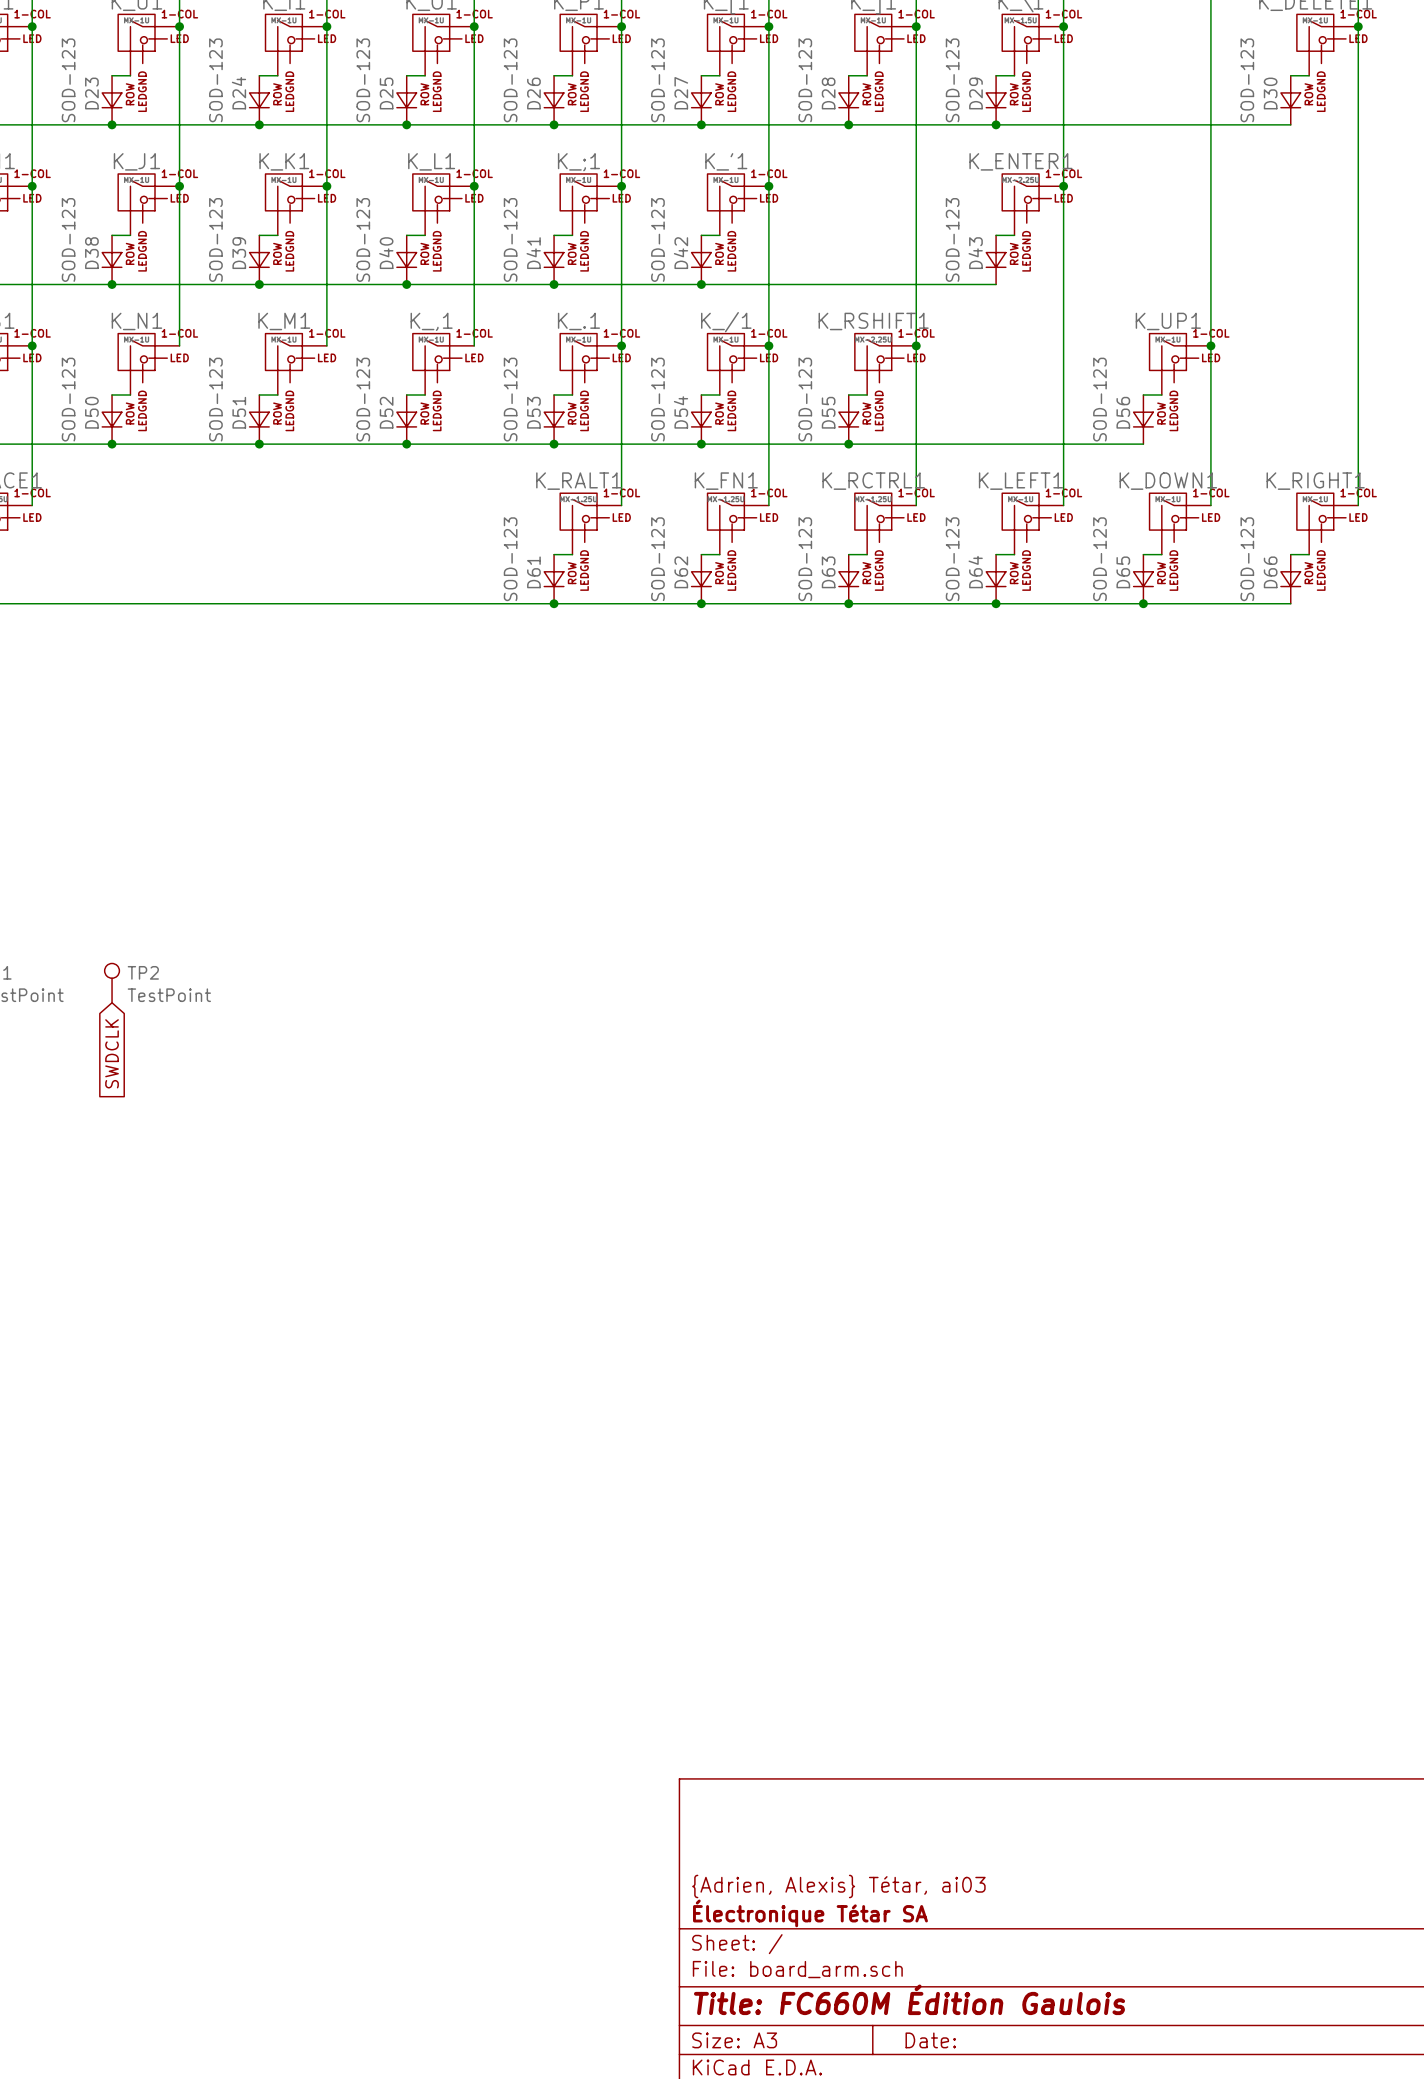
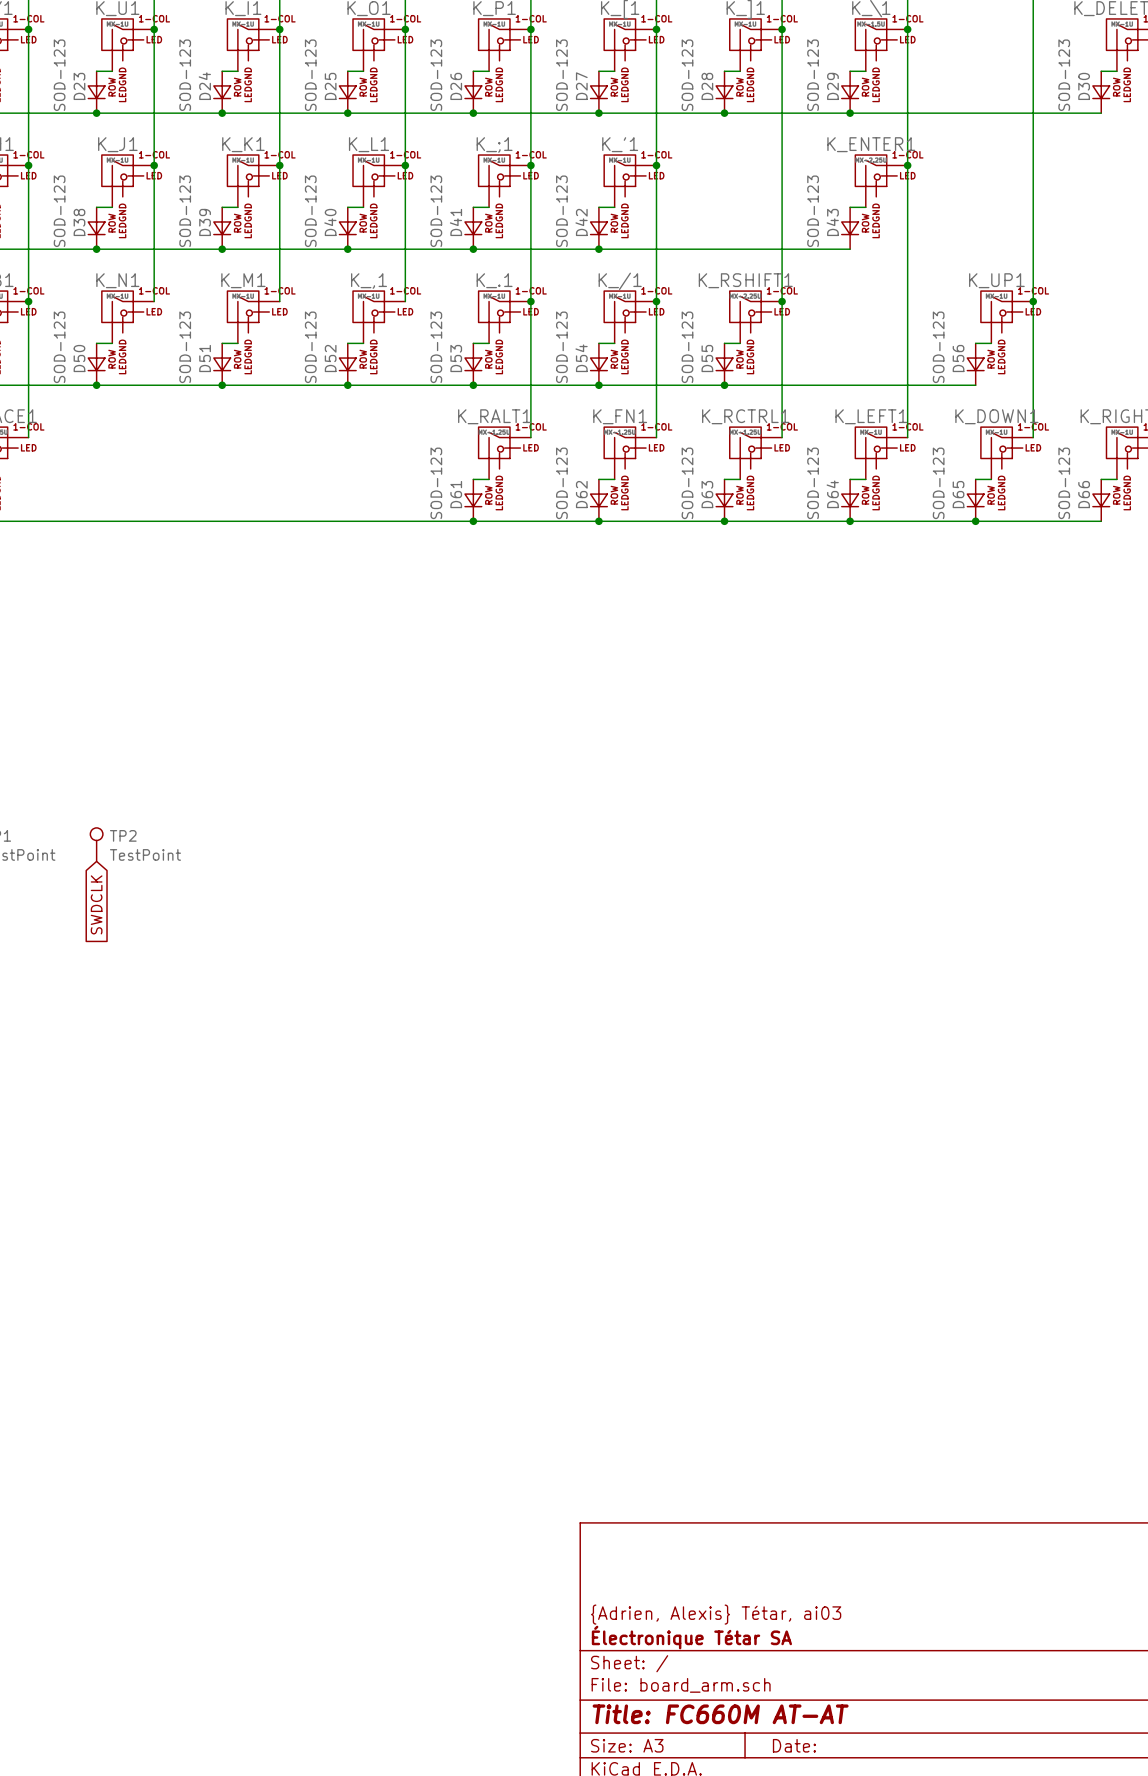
title block: Title: FC660M Édition Gaulois (909, 1999) -> Title: FC660M AT-AT (720, 1714)

